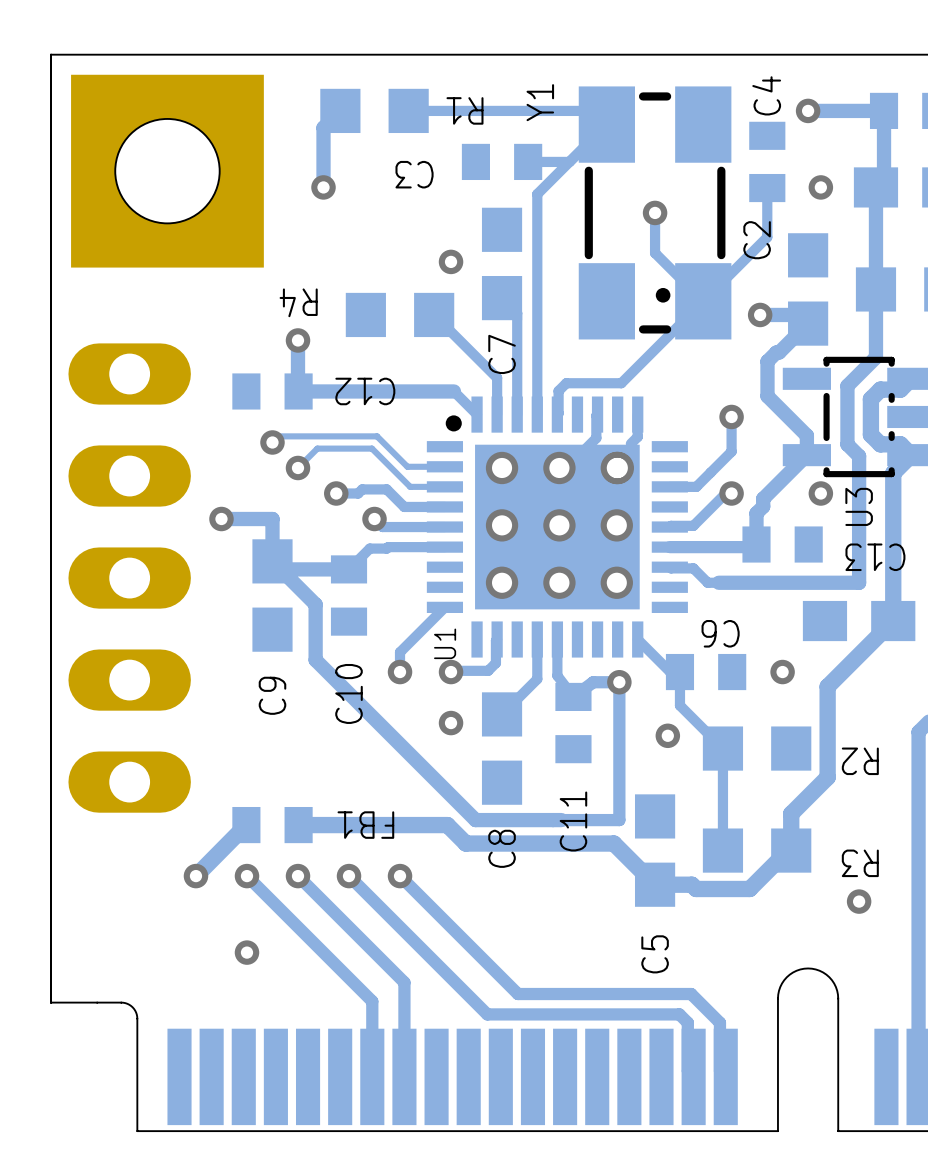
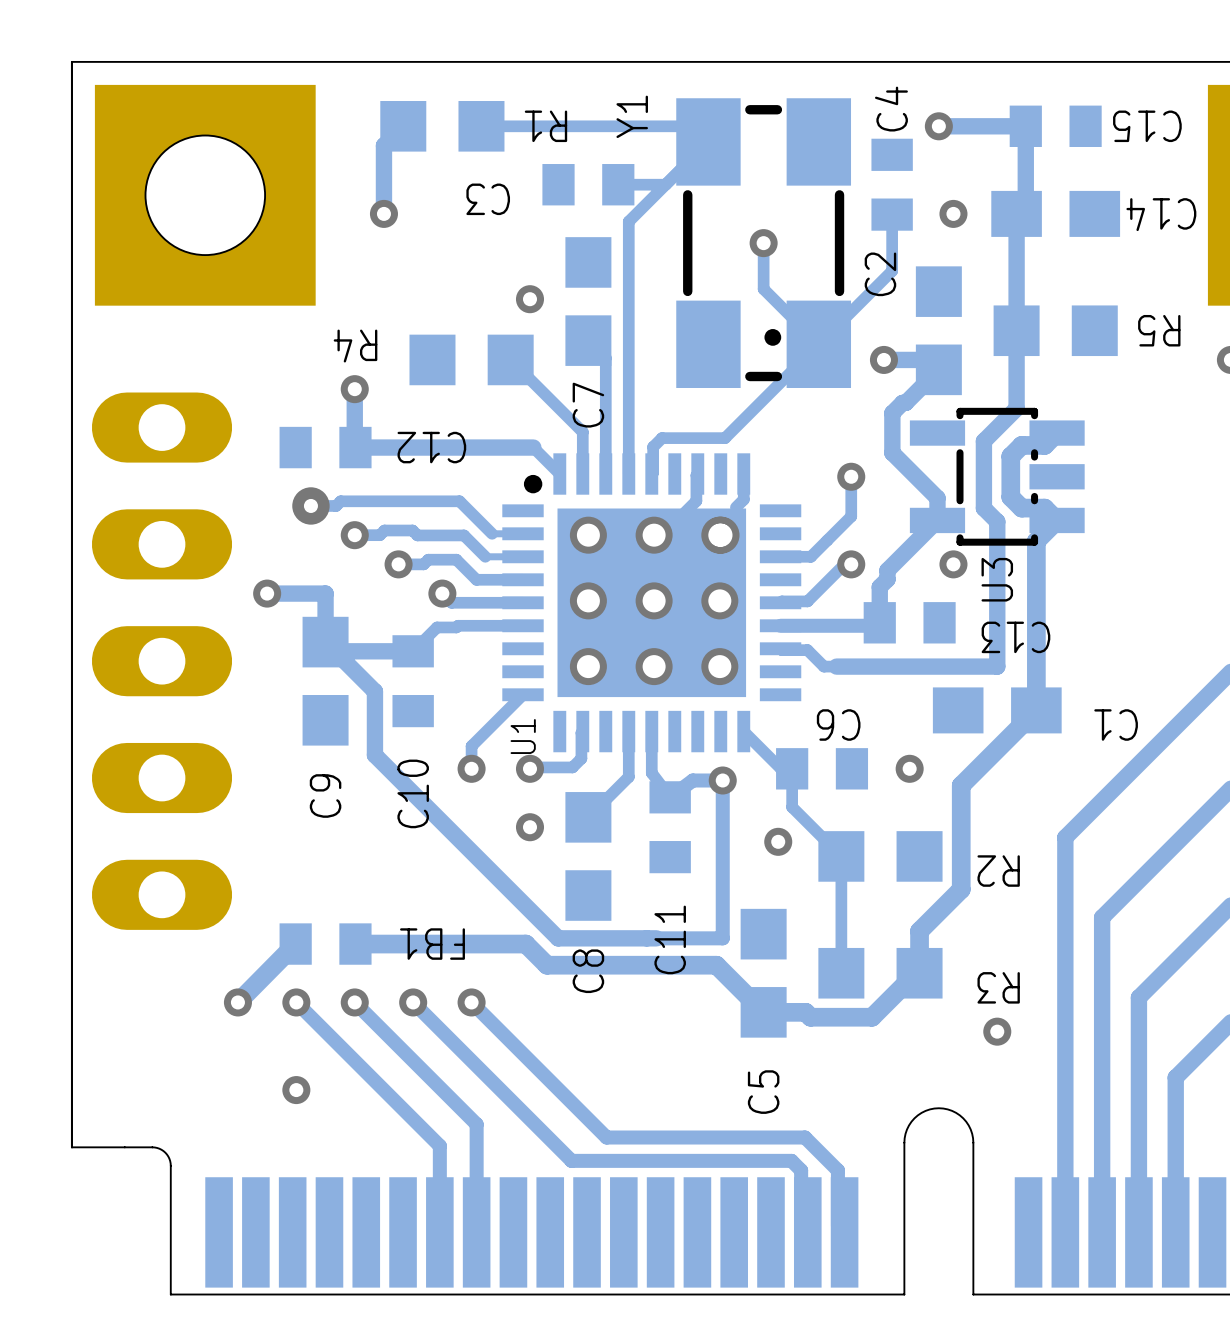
via size: [260, 430, 285, 455] -> [292, 487, 330, 525]
track: (272, 442) (278, 436) (377, 436) (407, 466) (417, 466) -> (310, 505) (336, 505) (340, 501) (459, 501) (492, 533)
track: (298, 467) (317, 448) (371, 448) (412, 486) -> (354, 535) (379, 535) (384, 530) (412, 530) (417, 535) (464, 535) (485, 556)

